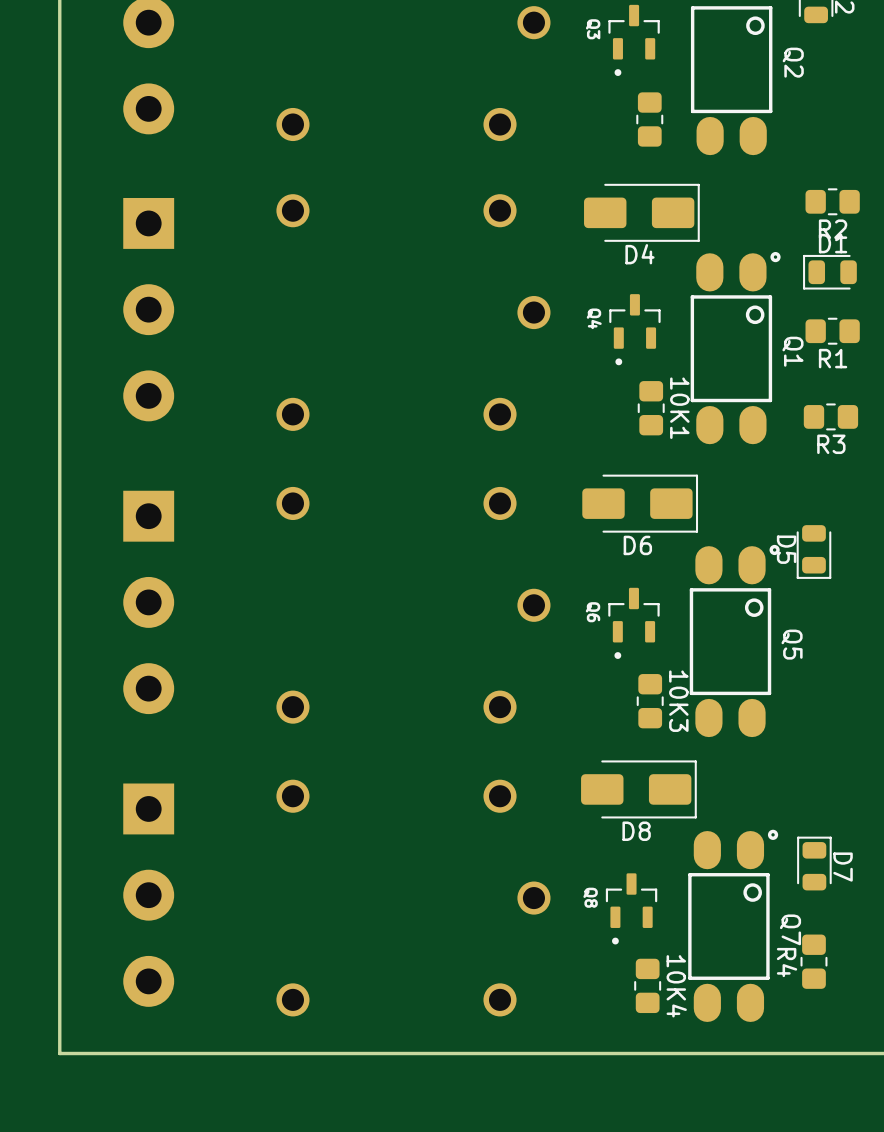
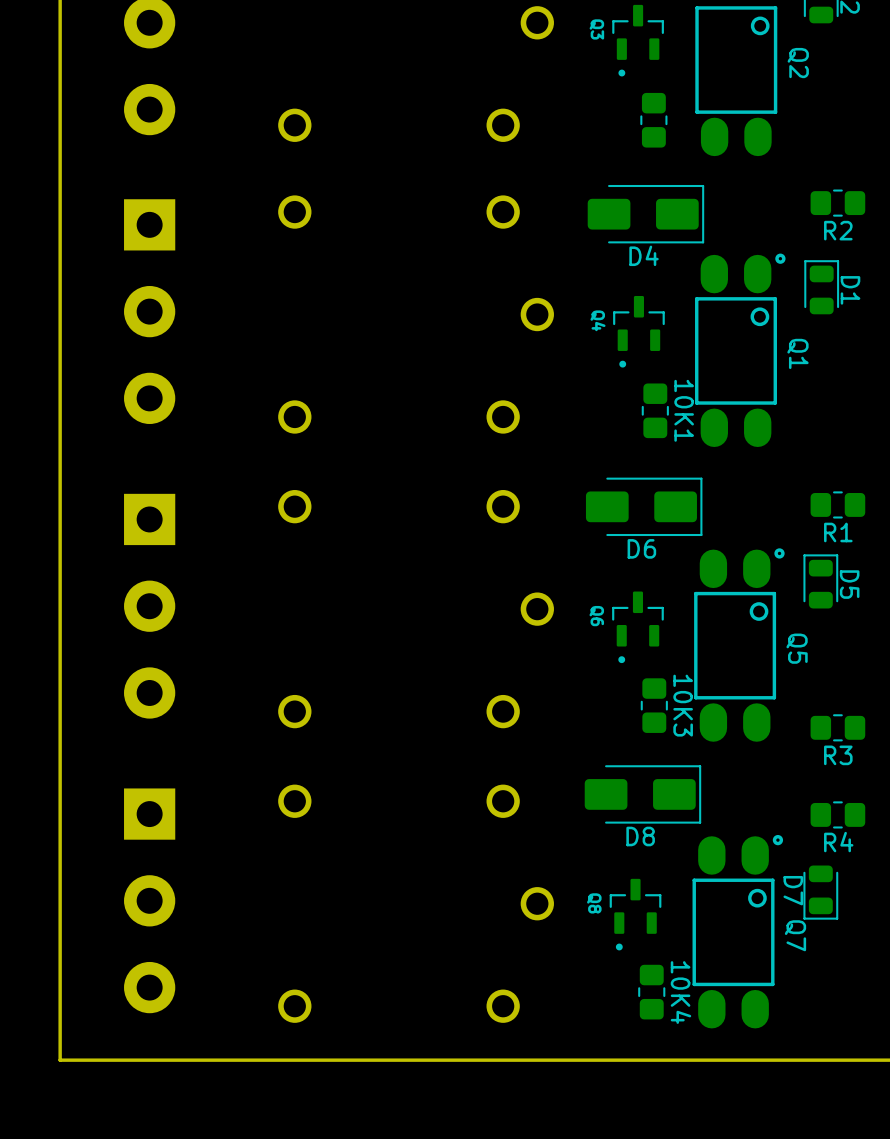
D1 rotation: 0° (829, 272) -> 90° clockwise (821, 287)
R1 position: (832, 331) -> (837, 504)
R3 position: (830, 416) -> (837, 727)
D5 rotation: 0° (813, 552) -> 180° (820, 581)
D7 rotation: 0° (814, 863) -> 180° (820, 892)
R4 rotation: 0° (813, 961) -> 90° clockwise (837, 814)
R4 position: (813, 961) -> (837, 814)
R4 name position: R4 (787, 962) -> R4 (838, 842)

